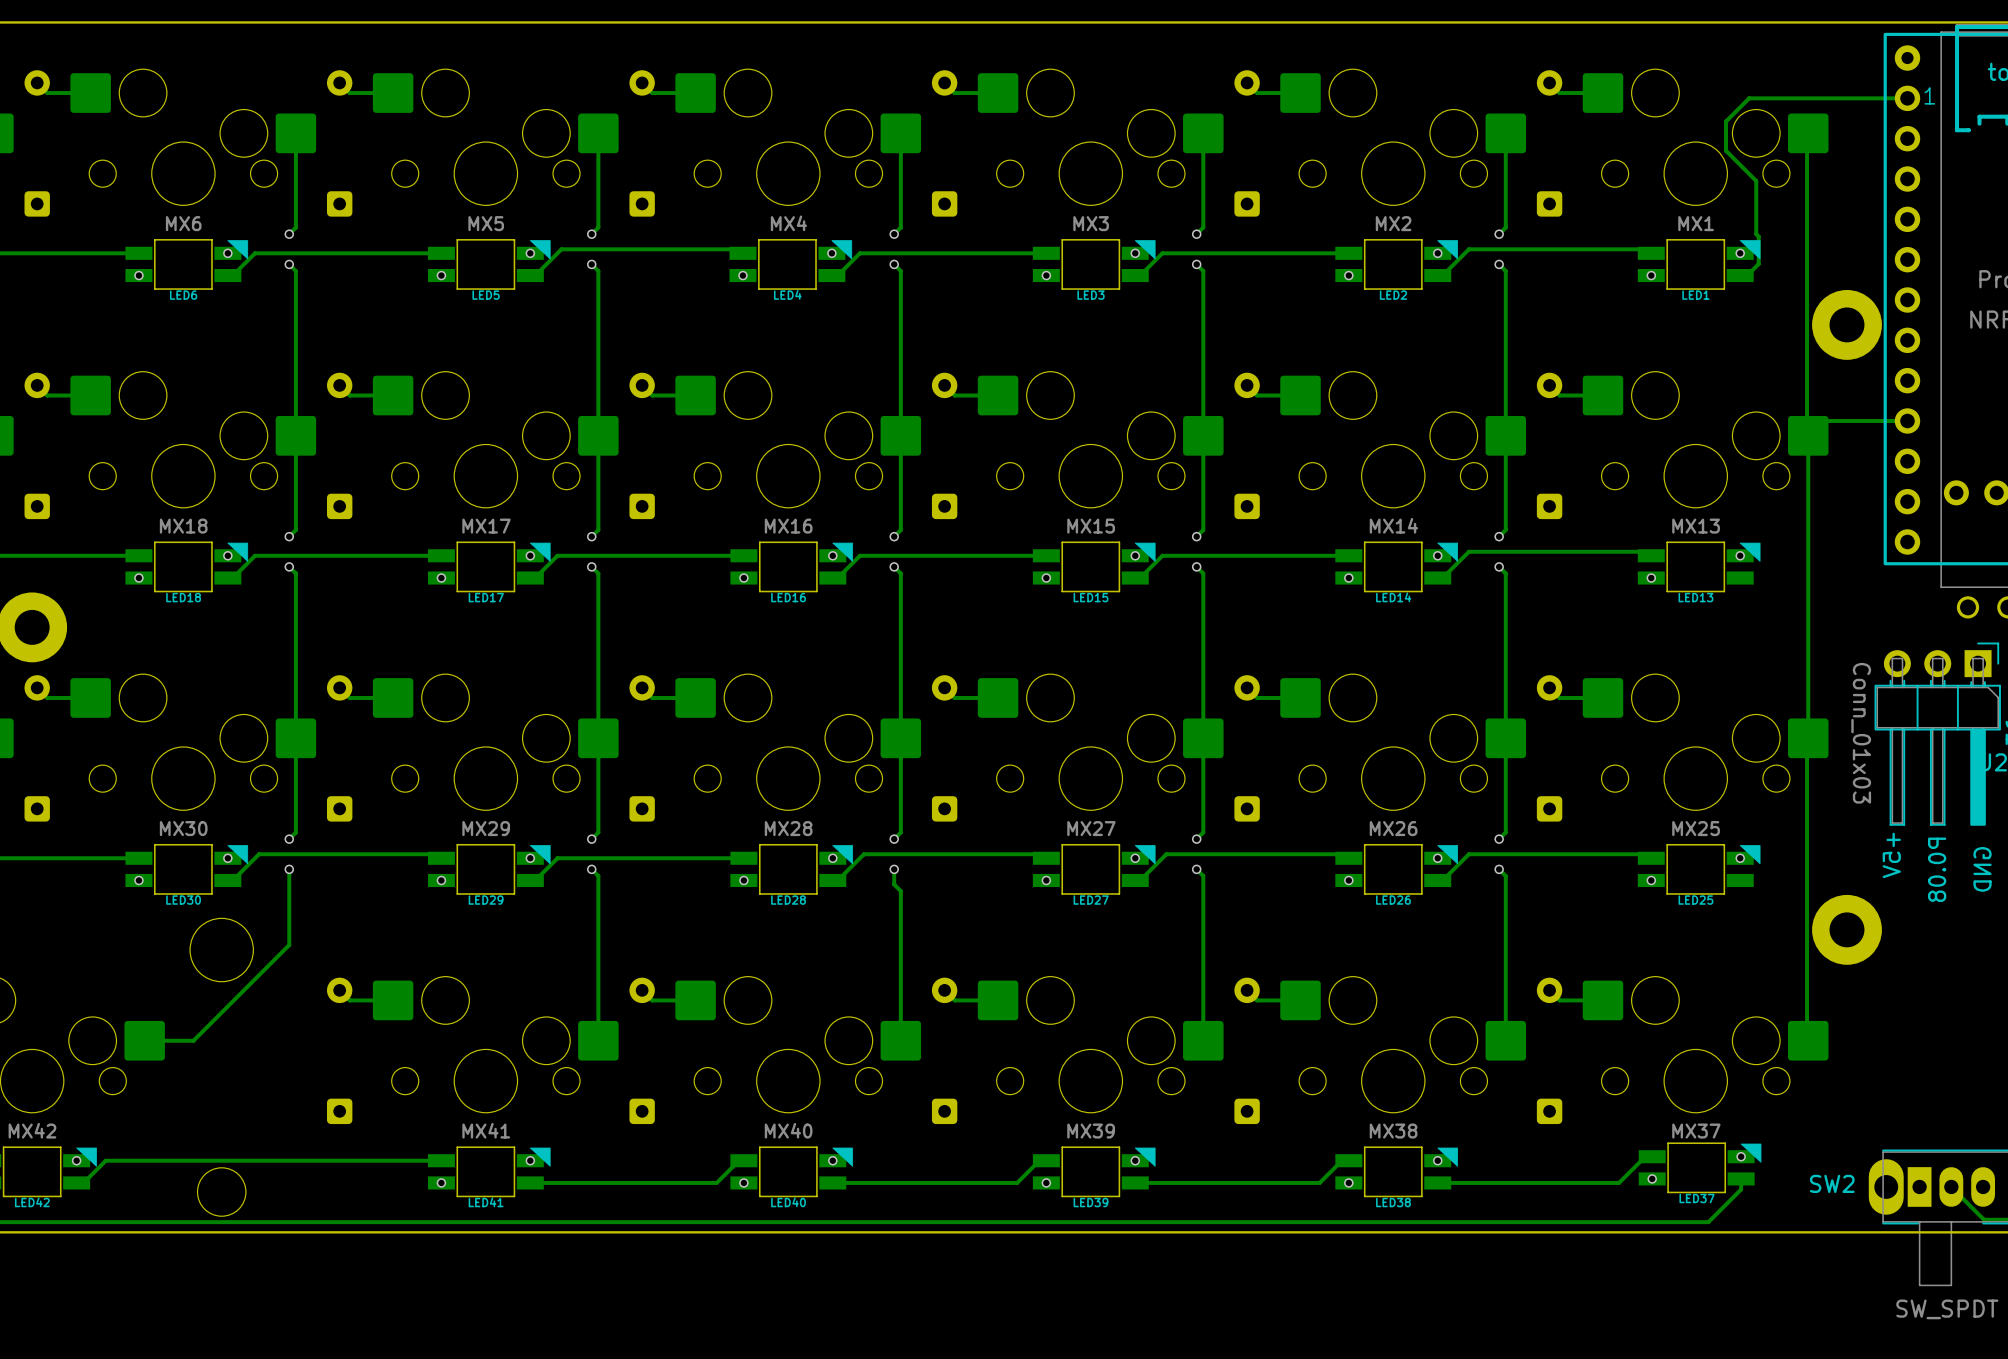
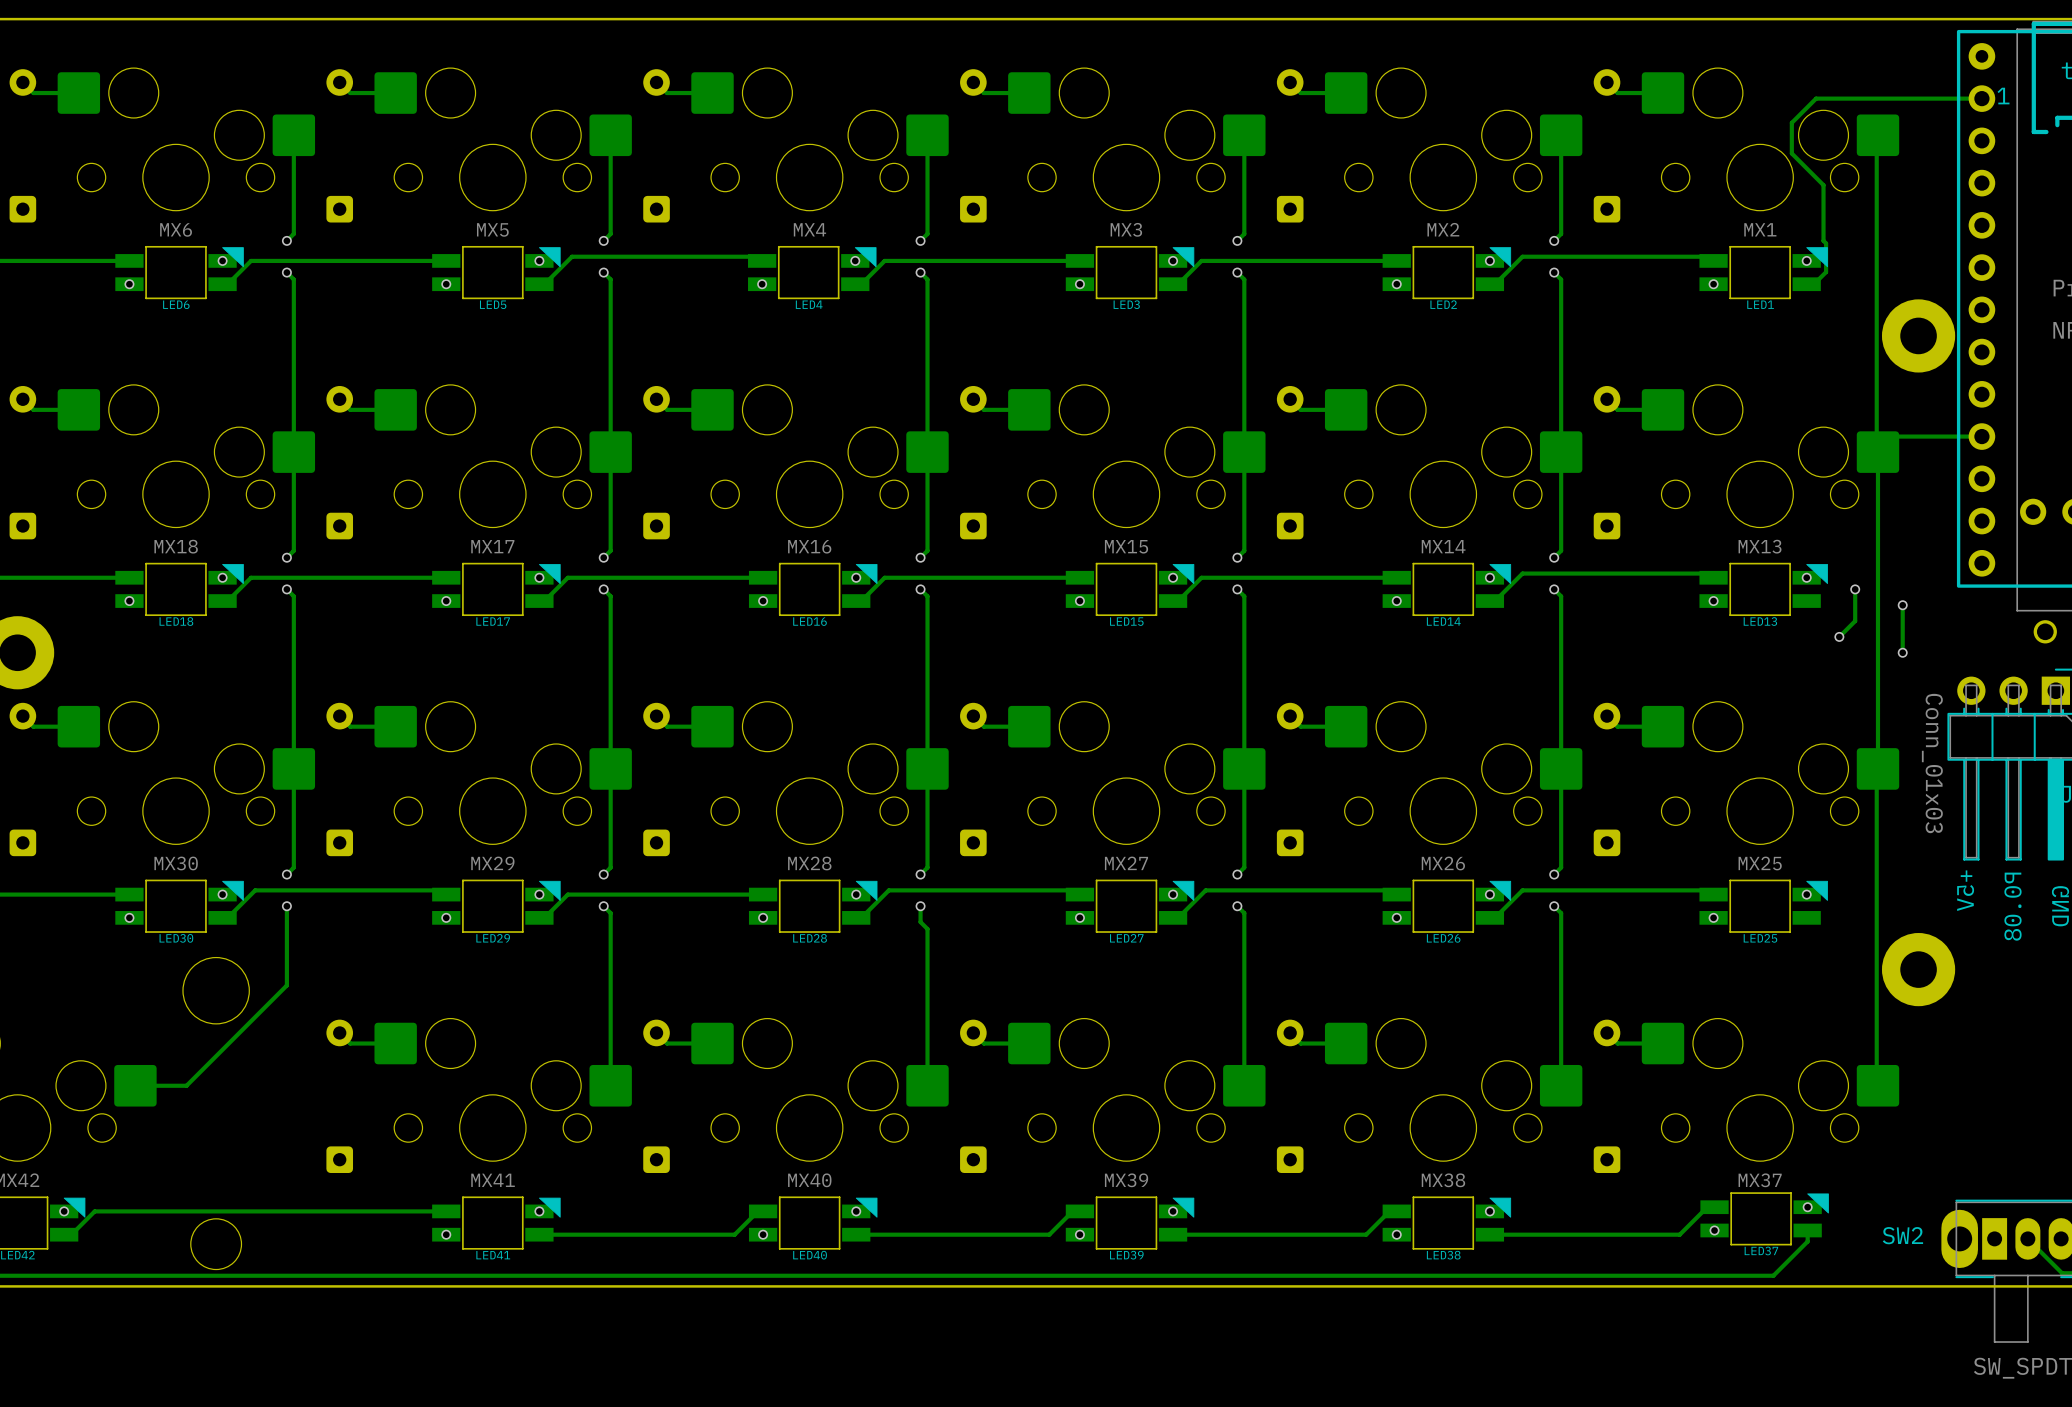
track: none -> (1855, 589) (1855, 621) (1839, 636)
via: none -> (1855, 589)
track: none -> (1902, 605) (1902, 652)
via: none -> (1902, 605)
via: none -> (1839, 636)
via: none -> (1902, 652)

